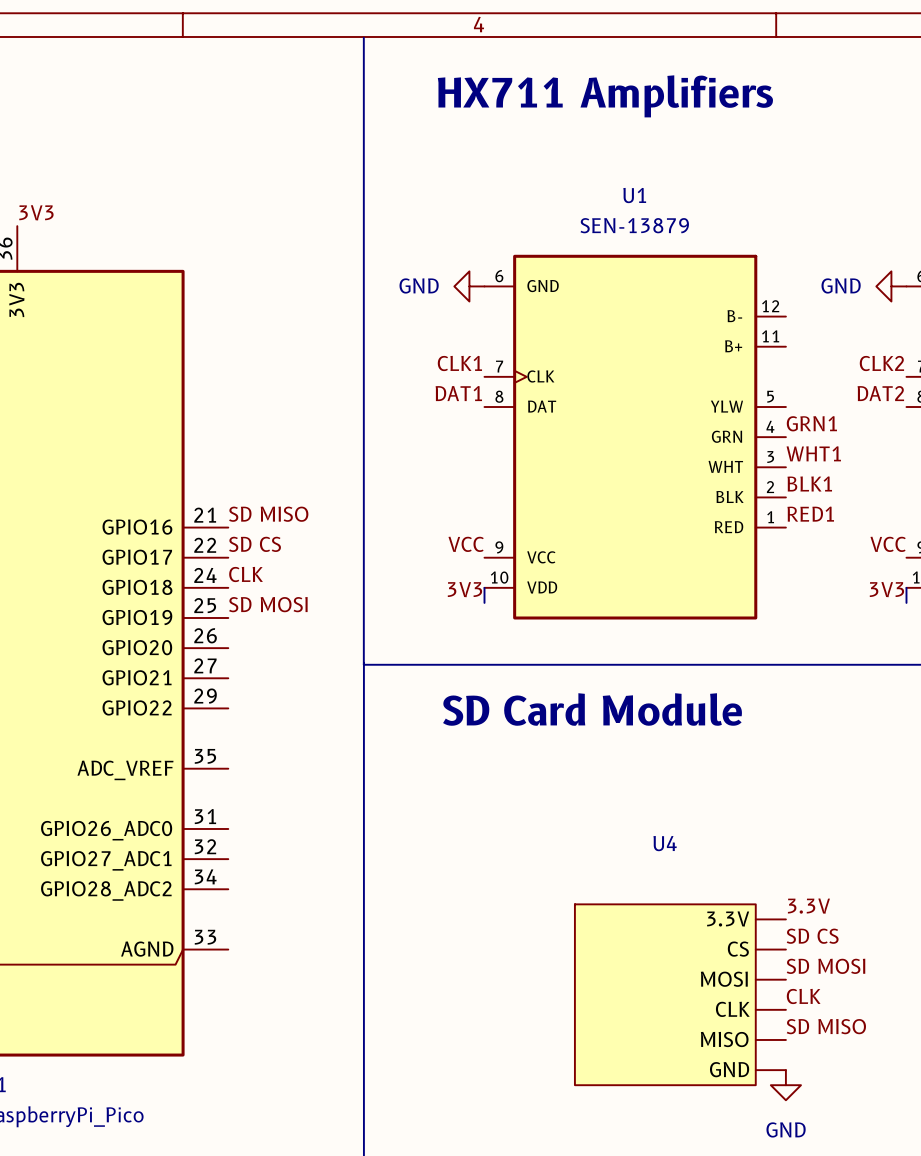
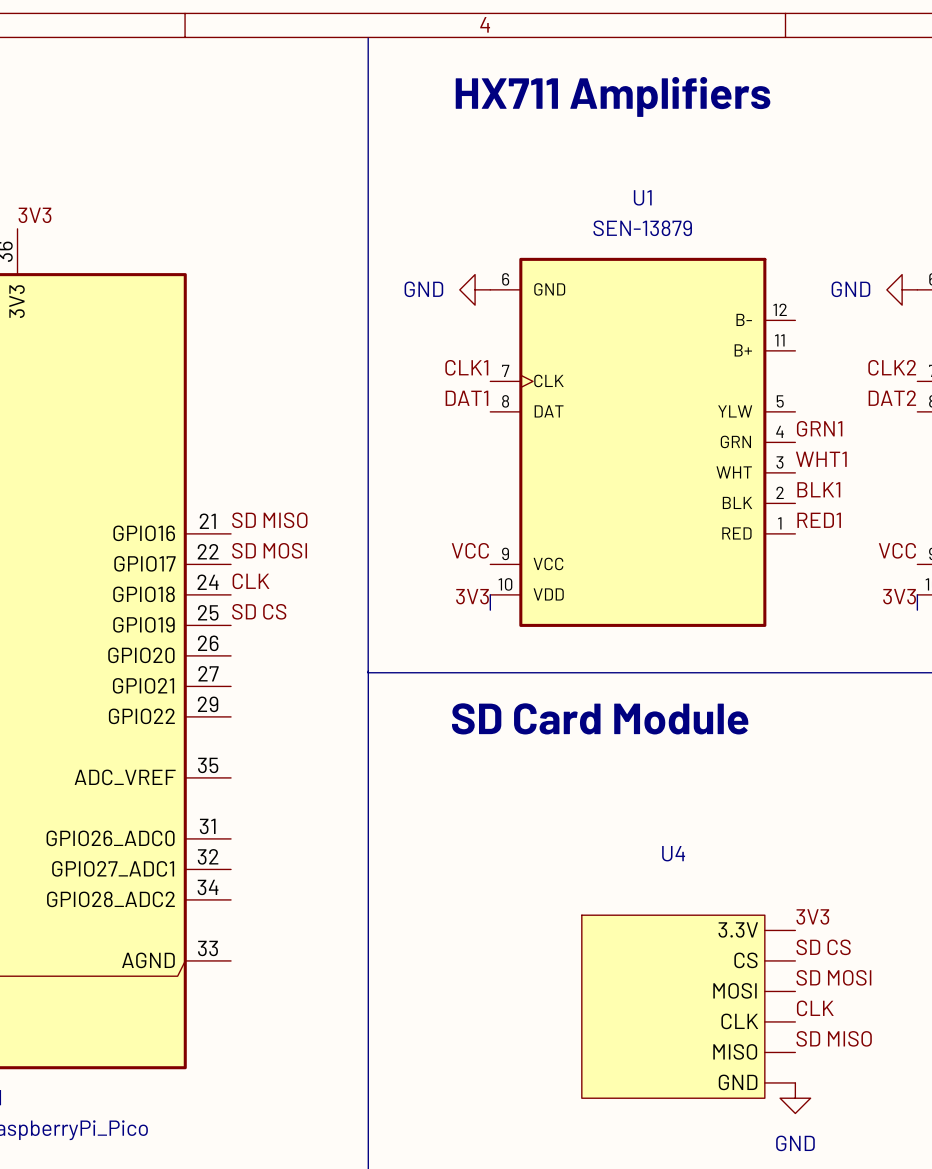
label: SD CS (255, 544) -> SD MOSI (269, 550)
label: SD MOSI (268, 604) -> SD CS (259, 611)
label: 3.3V (808, 906) -> 3V3 (812, 916)

